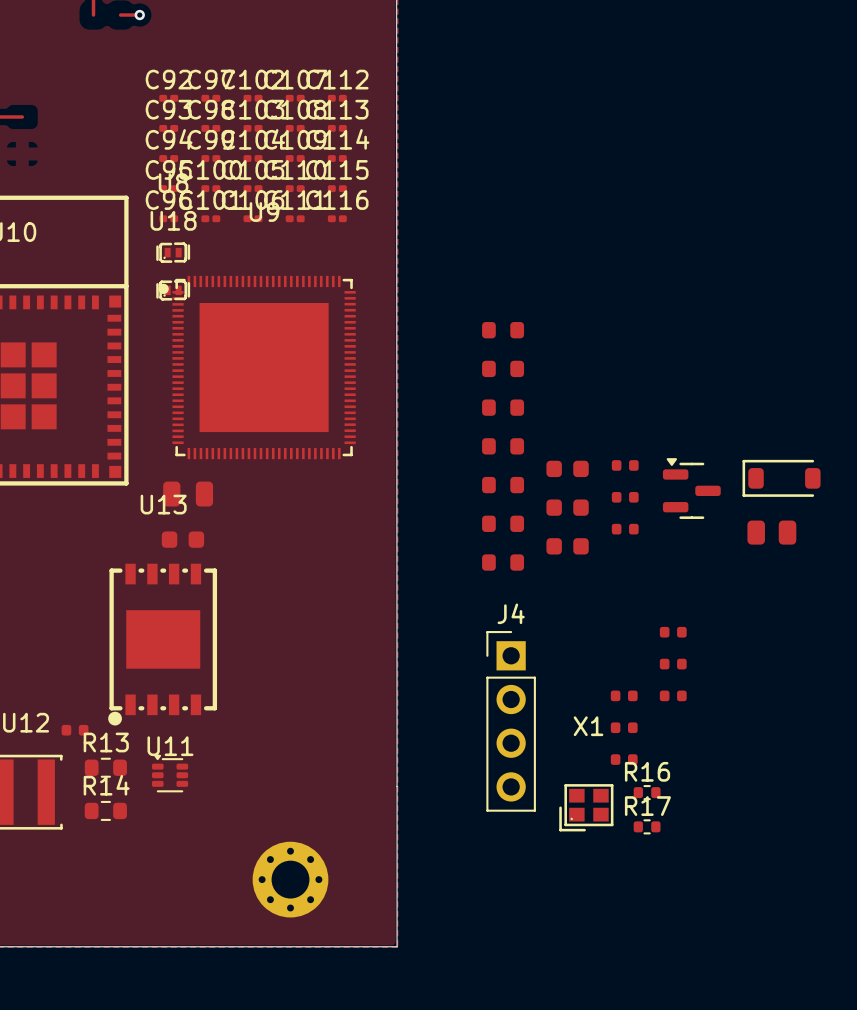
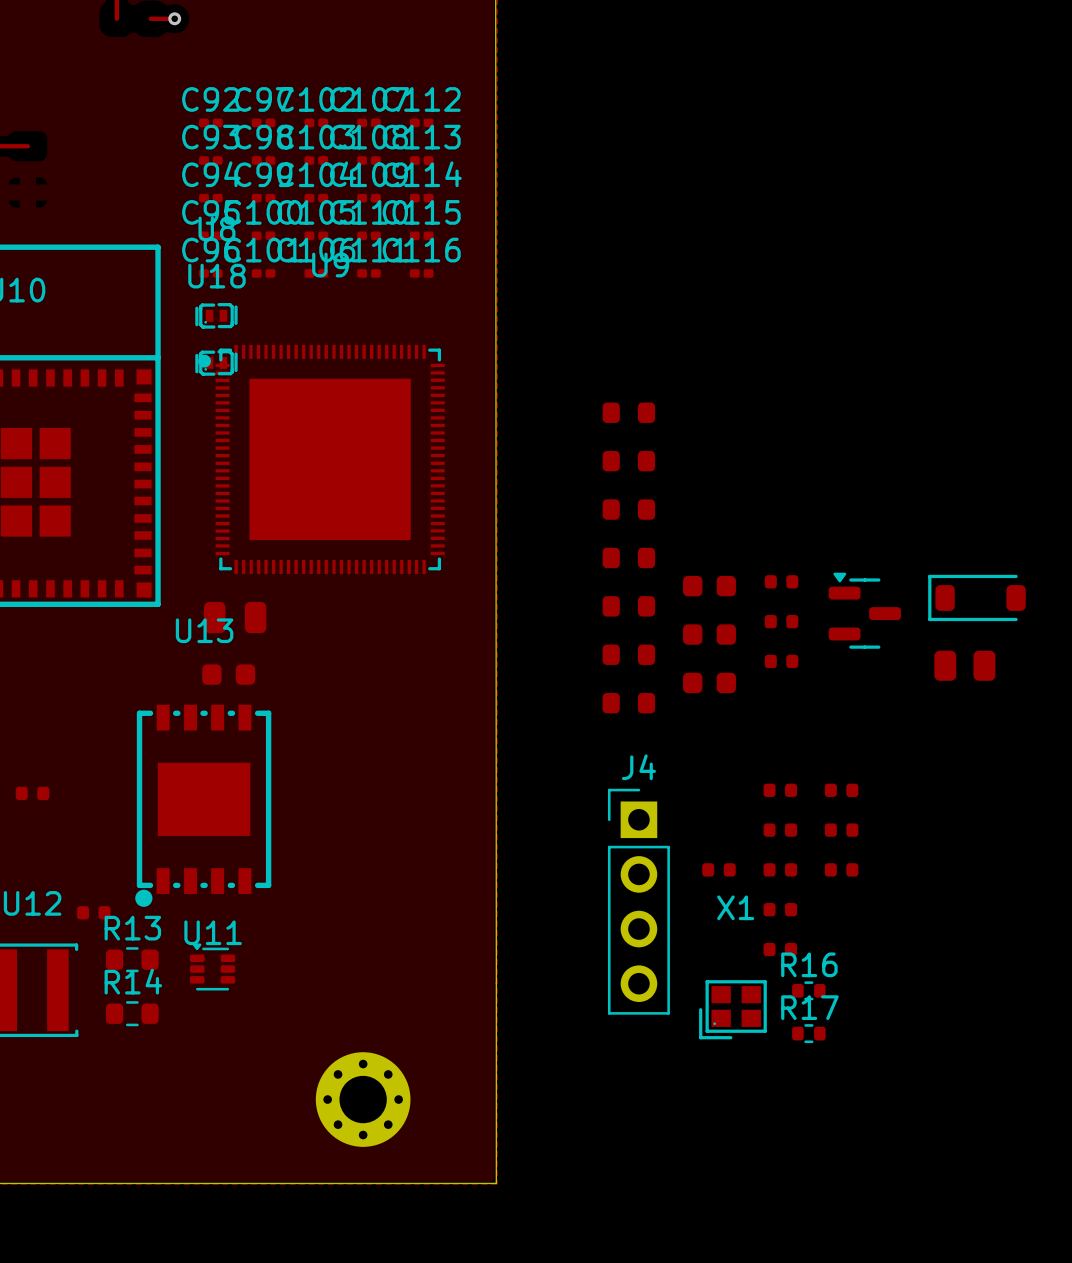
part: none -> (780, 790)
part: none -> (32, 793)
part: none -> (780, 830)
part: none -> (718, 869)

